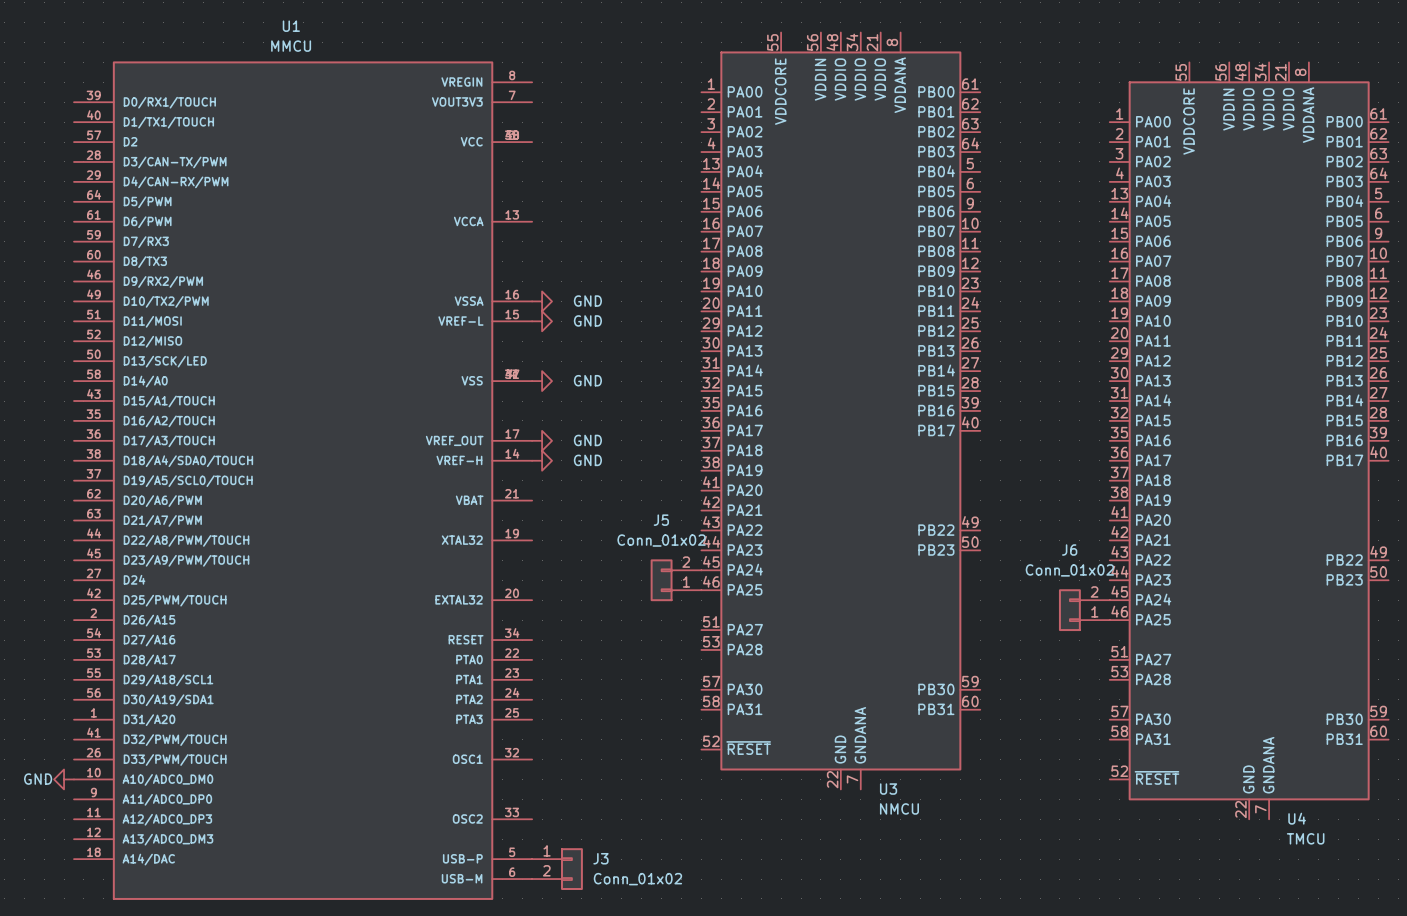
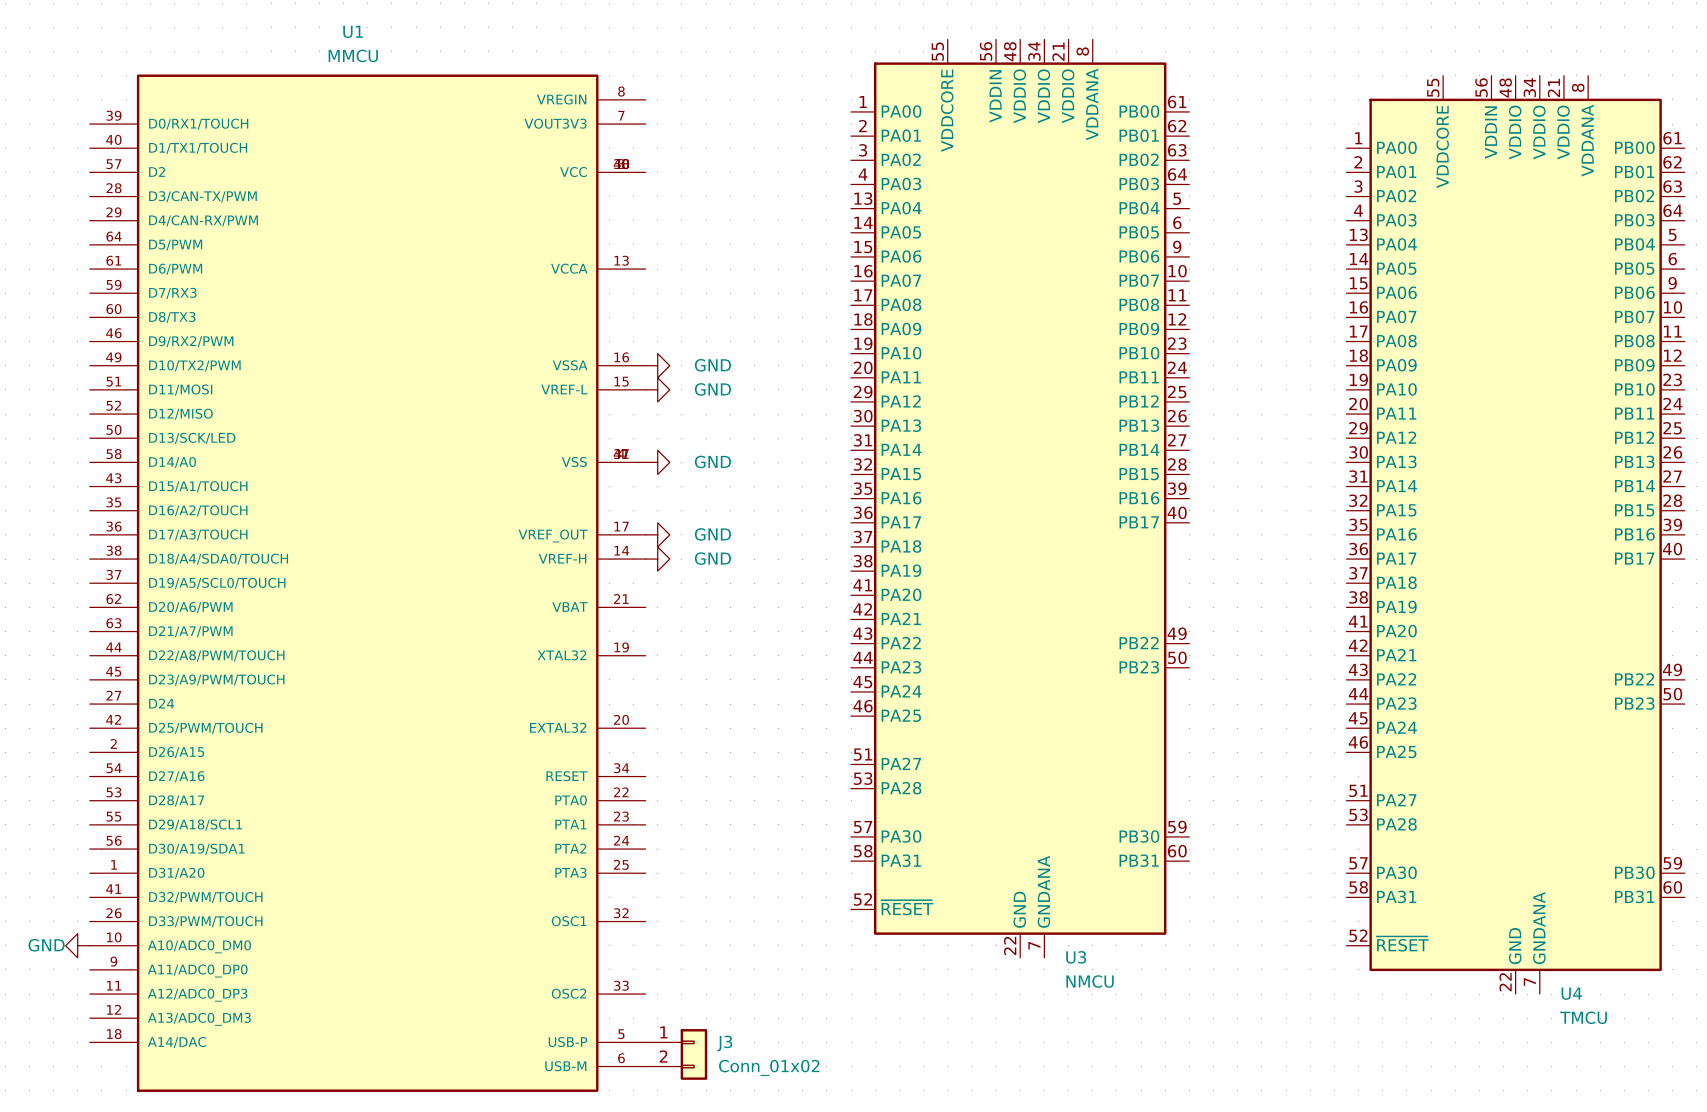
J5: Conn_01x02 (676, 580) -> none
J6: Conn_01x02 (1084, 610) -> none

